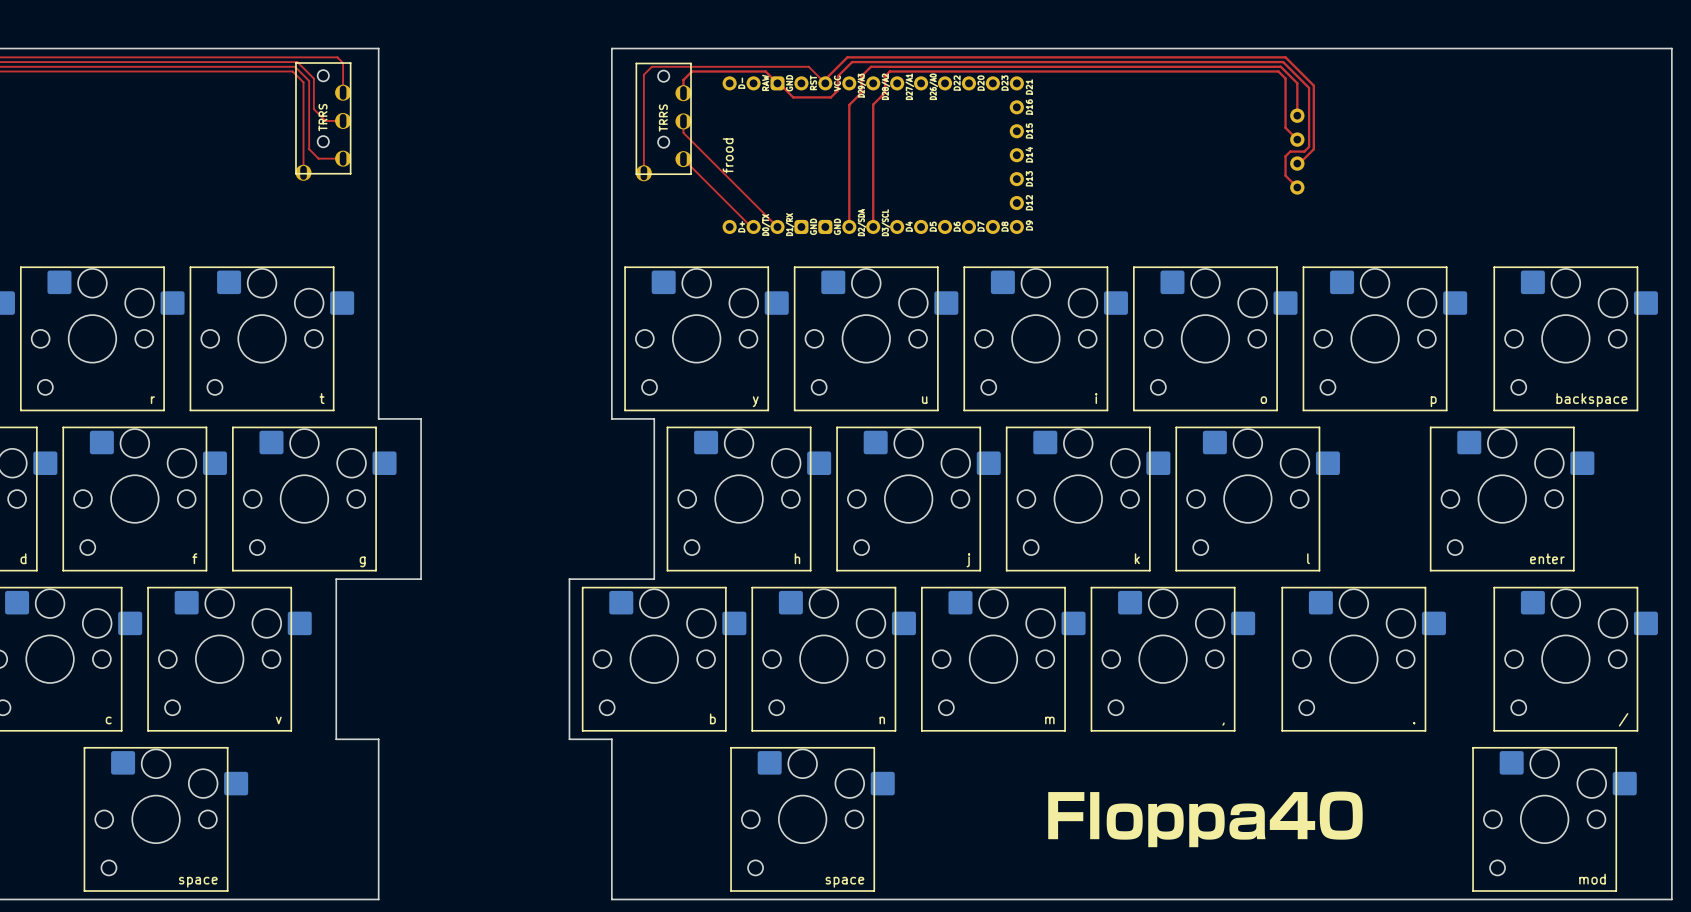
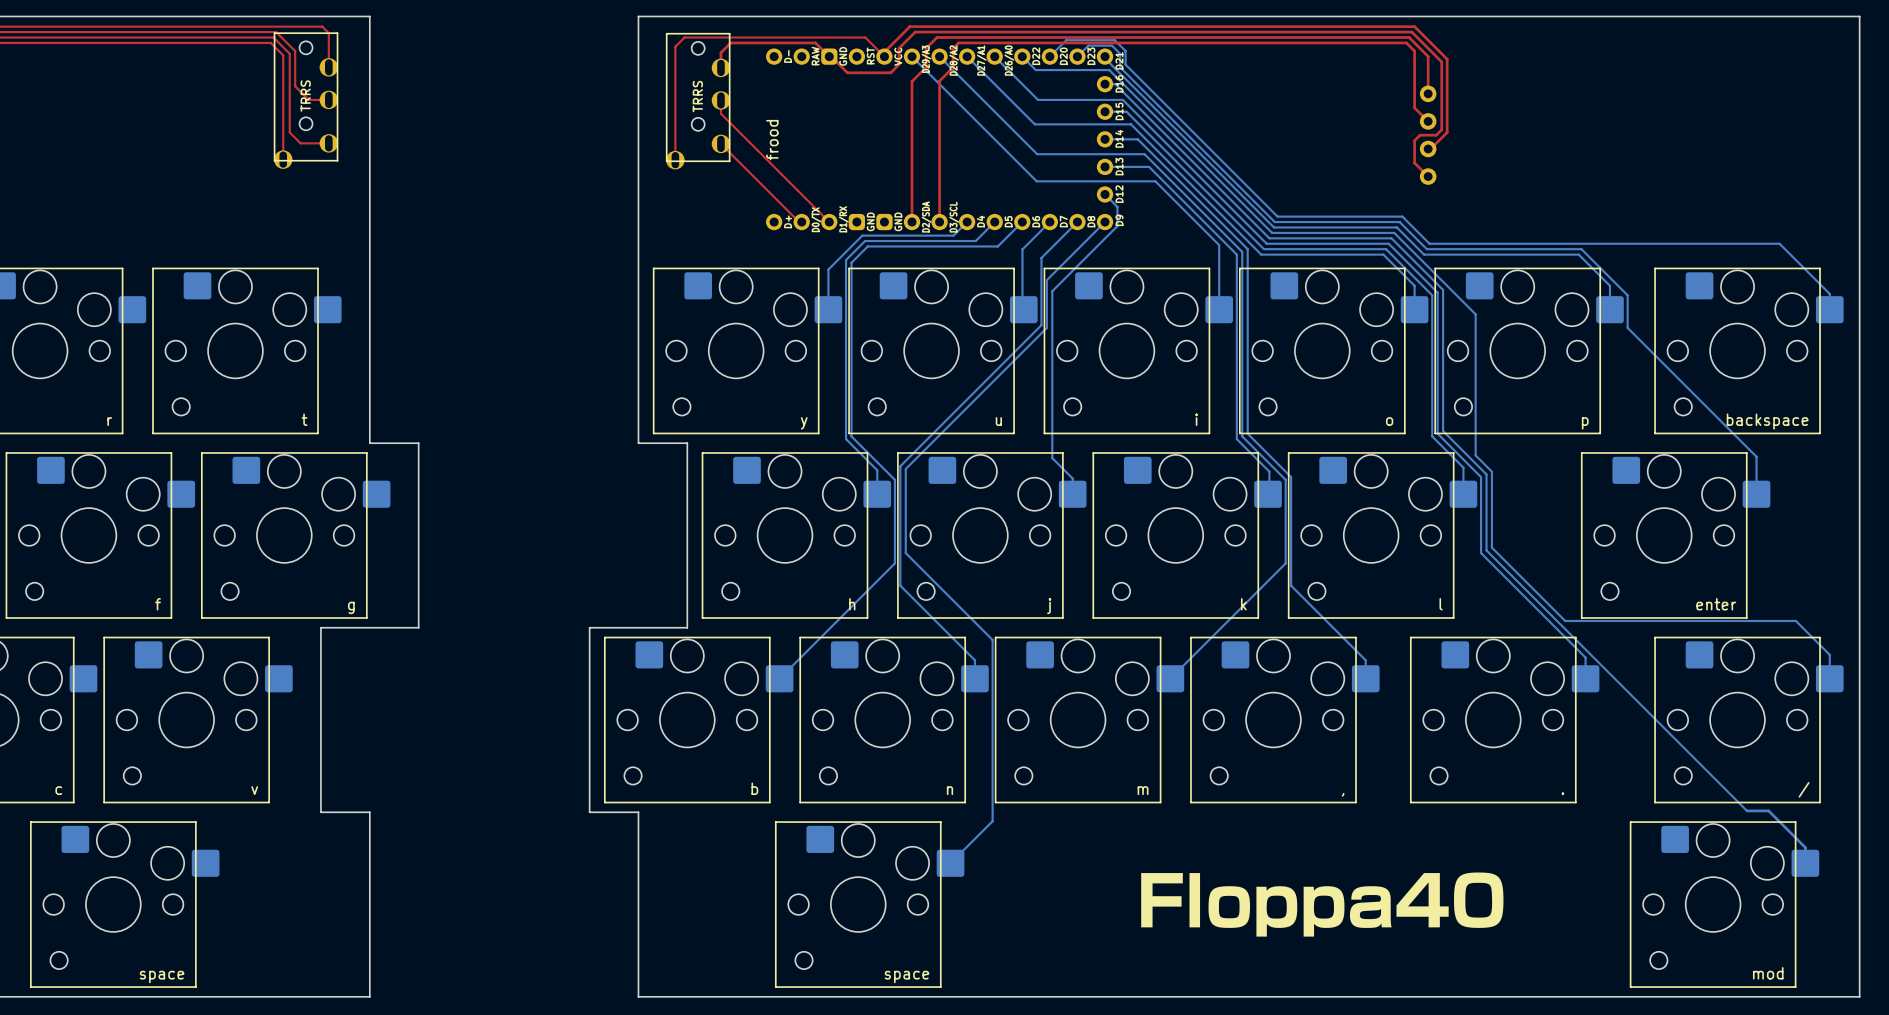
bottom track: none -> (912, 56) (1036, 181) (1155, 181) (1219, 245) (1219, 309)
bottom track: none -> (939, 56) (1037, 154) (1144, 154) (1242, 251) (1242, 436) (1285, 479) (1285, 563) (1170, 678)
bottom track: none -> (967, 56) (1034, 124) (1131, 124) (1261, 254) (1383, 254) (1414, 285) (1414, 309)
bottom track: none -> (994, 56) (1038, 99) (1122, 99) (1266, 243) (1388, 243) (1437, 292) (1437, 433) (1481, 477) (1481, 553) (1585, 657) (1585, 678)
bottom track: none -> (1022, 56) (1035, 70) (1109, 70) (1272, 232) (1394, 232) (1475, 314) (1475, 455) (1491, 471) (1491, 547) (1565, 620) (1795, 620) (1829, 654) (1829, 678)
bottom track: none -> (1049, 56) (1066, 40) (1114, 40) (1125, 51) (1125, 64) (1277, 216) (1402, 216) (1429, 243) (1779, 243) (1829, 293) (1829, 309)
bottom track: none -> (1077, 56) (1088, 45) (1112, 45) (1120, 53) (1120, 67) (1274, 222) (1399, 222) (1426, 249) (1581, 249) (1627, 295) (1627, 327) (1756, 456) (1756, 494)
bottom track: none -> (1105, 56) (1273, 227) (1396, 227) (1424, 254) (1578, 254) (1609, 285) (1609, 309)
bottom track: none -> (1105, 84) (1115, 84) (1269, 238) (1391, 238) (1443, 289) (1443, 431) (1486, 474) (1486, 550) (1747, 810) (1768, 810) (1805, 847) (1805, 863)
bottom track: none -> (1105, 111) (1126, 111) (1263, 249) (1386, 249) (1432, 295) (1432, 436) (1463, 467) (1463, 494)
bottom track: none -> (1105, 139) (1137, 139) (1247, 249) (1247, 433) (1291, 477) (1291, 585) (1365, 660) (1365, 678)
bottom track: none -> (1105, 166) (1149, 166) (1236, 254) (1236, 439) (1269, 471) (1268, 494)
bottom track: none -> (1105, 194) (1117, 206) (1117, 226) (1052, 291) (1052, 458) (1072, 478) (1072, 494)
bottom track: none -> (967, 222) (953, 235) (862, 235) (828, 269) (828, 309)
bottom track: none -> (994, 222) (975, 241) (865, 241) (846, 260) (846, 439) (877, 470) (877, 494)
bottom track: none -> (1022, 222) (997, 246) (867, 246) (851, 262) (851, 436) (894, 479) (894, 563) (779, 678)
bottom track: none -> (1049, 222) (1022, 249) (1023, 309)
bottom track: none -> (1077, 222) (1041, 258) (1041, 325) (900, 466) (900, 585) (974, 660) (974, 678)
bottom track: none -> (1105, 222) (1046, 280) (1046, 327) (905, 468) (905, 553) (992, 639) (992, 821) (950, 863)

